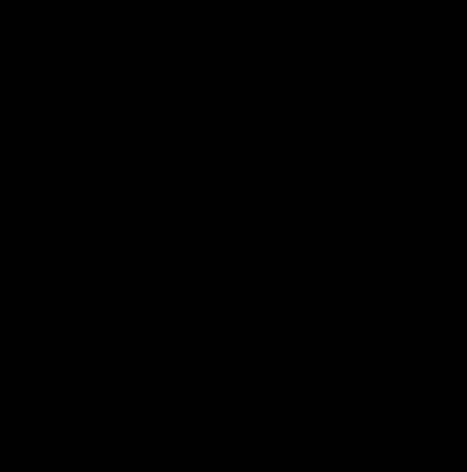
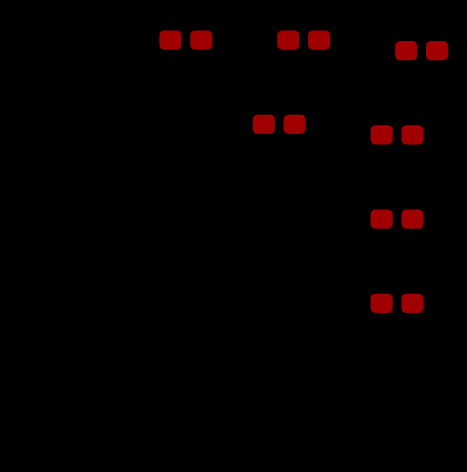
part: none -> (185, 40)
part: none -> (303, 40)
part: none -> (421, 50)
part: none -> (279, 124)
part: none -> (397, 134)
part: none -> (397, 219)
part: none -> (397, 303)

